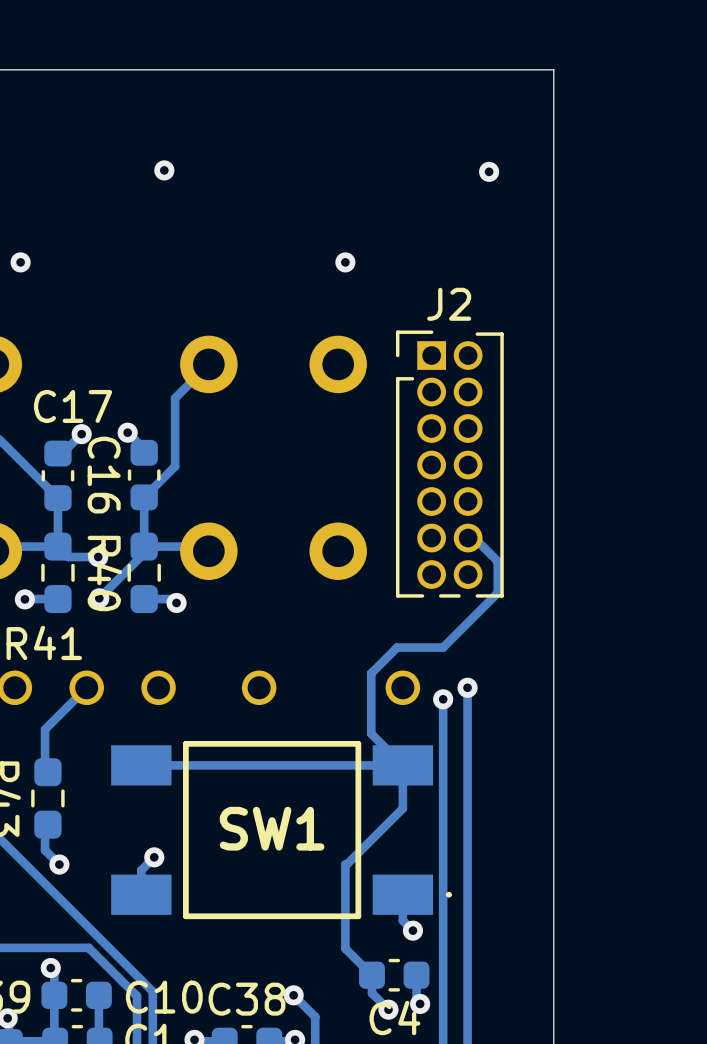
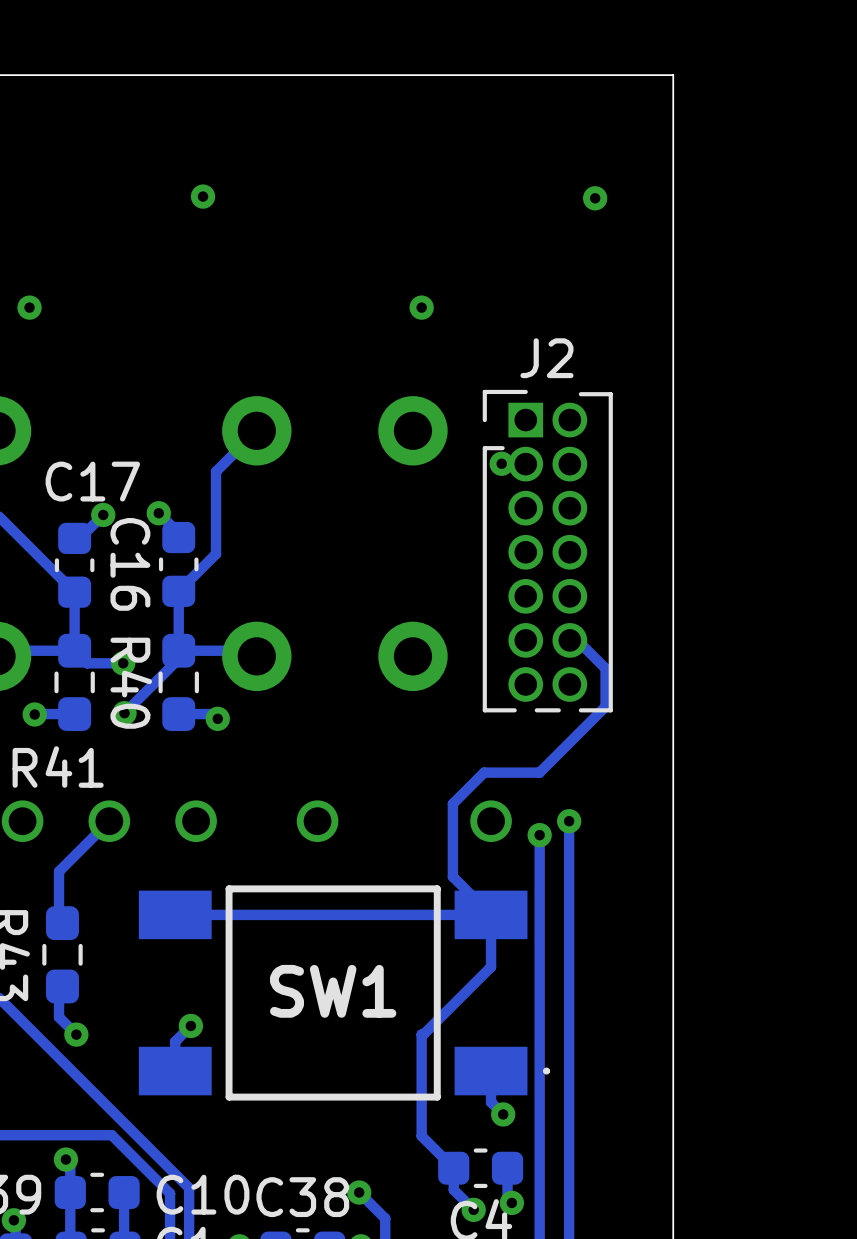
via: none -> (501, 463)

